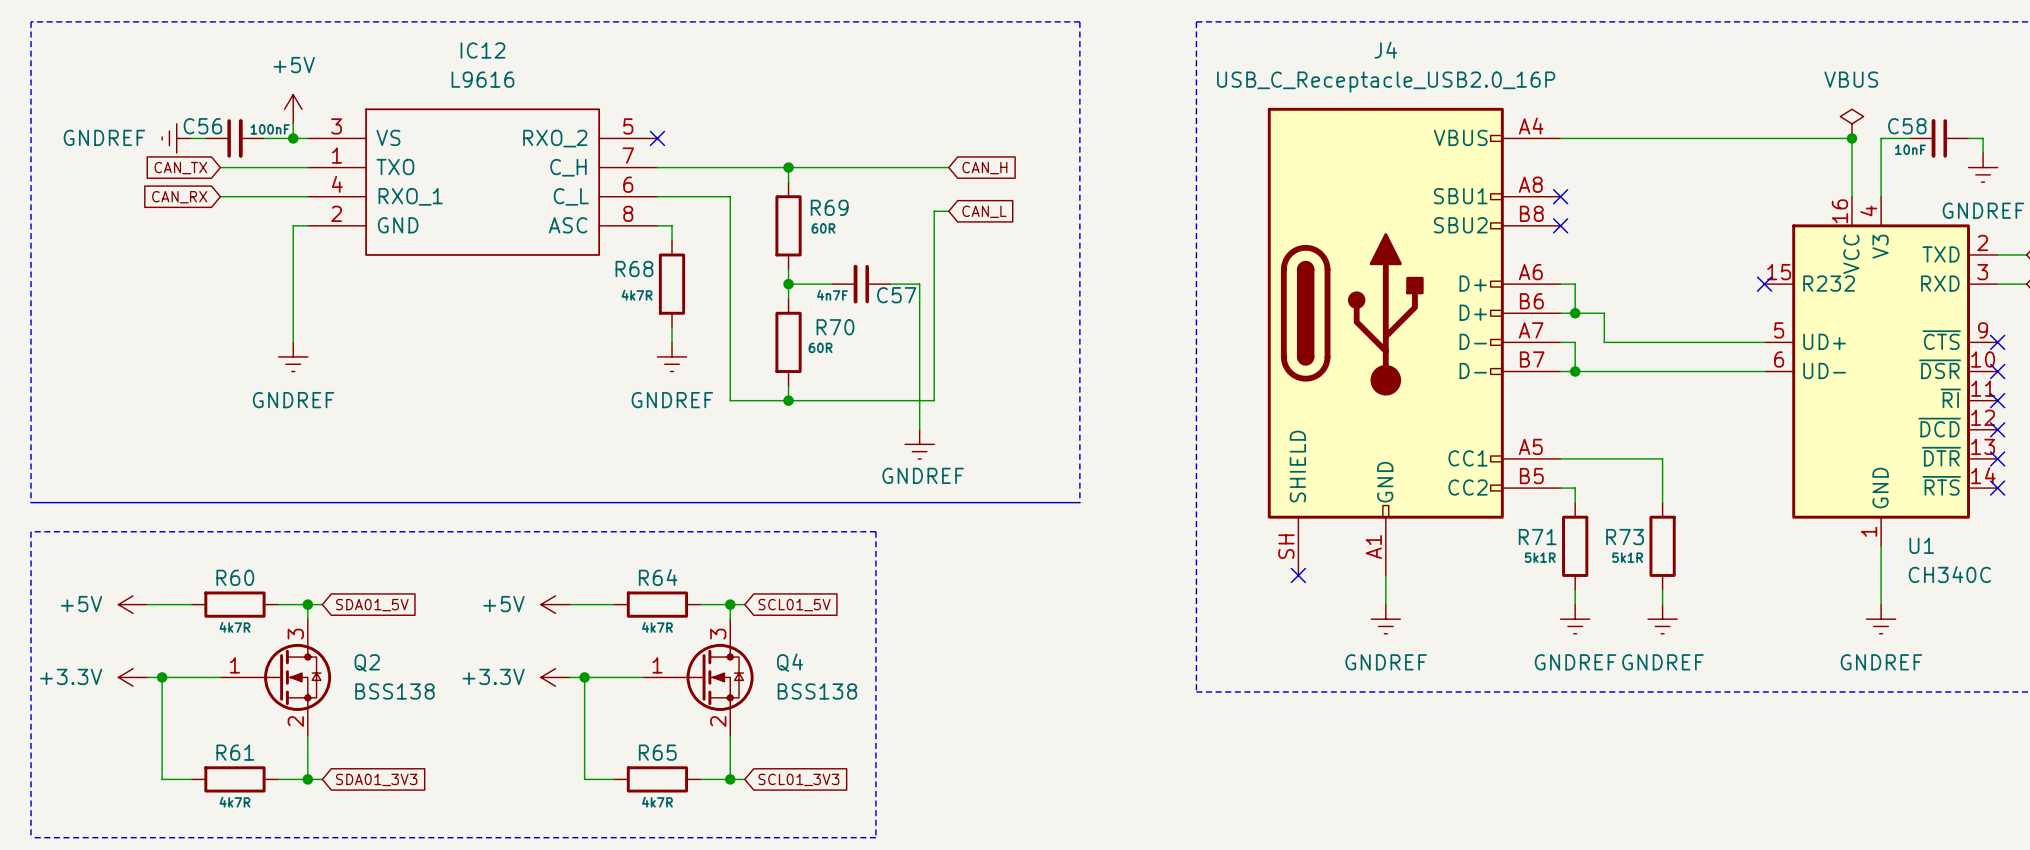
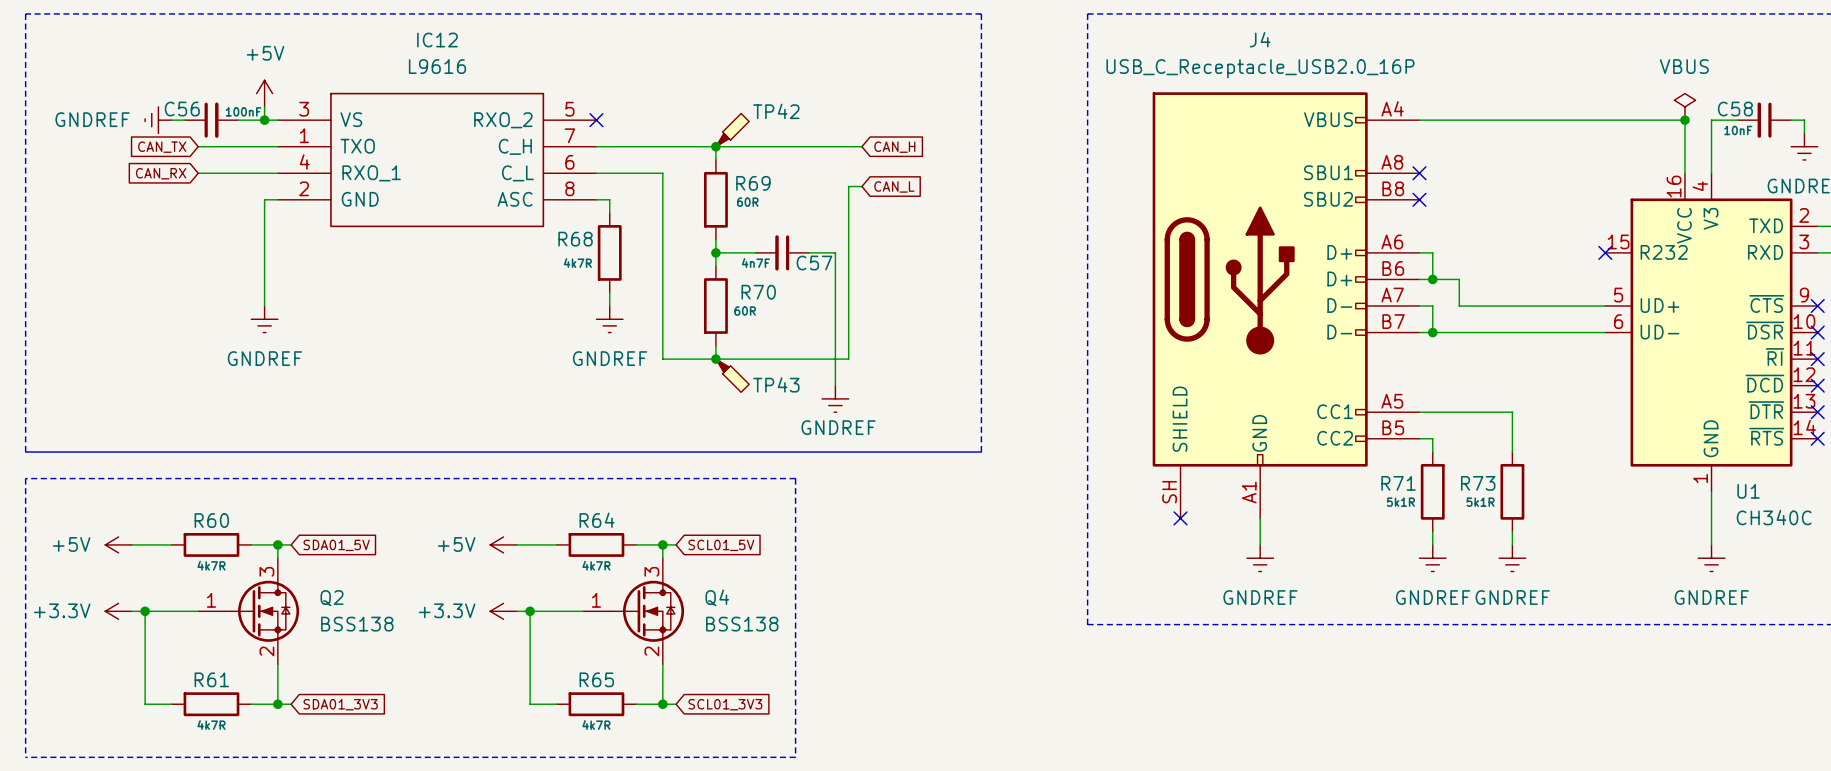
TP42: none -> (732, 130)
TP43: none -> (732, 375)

